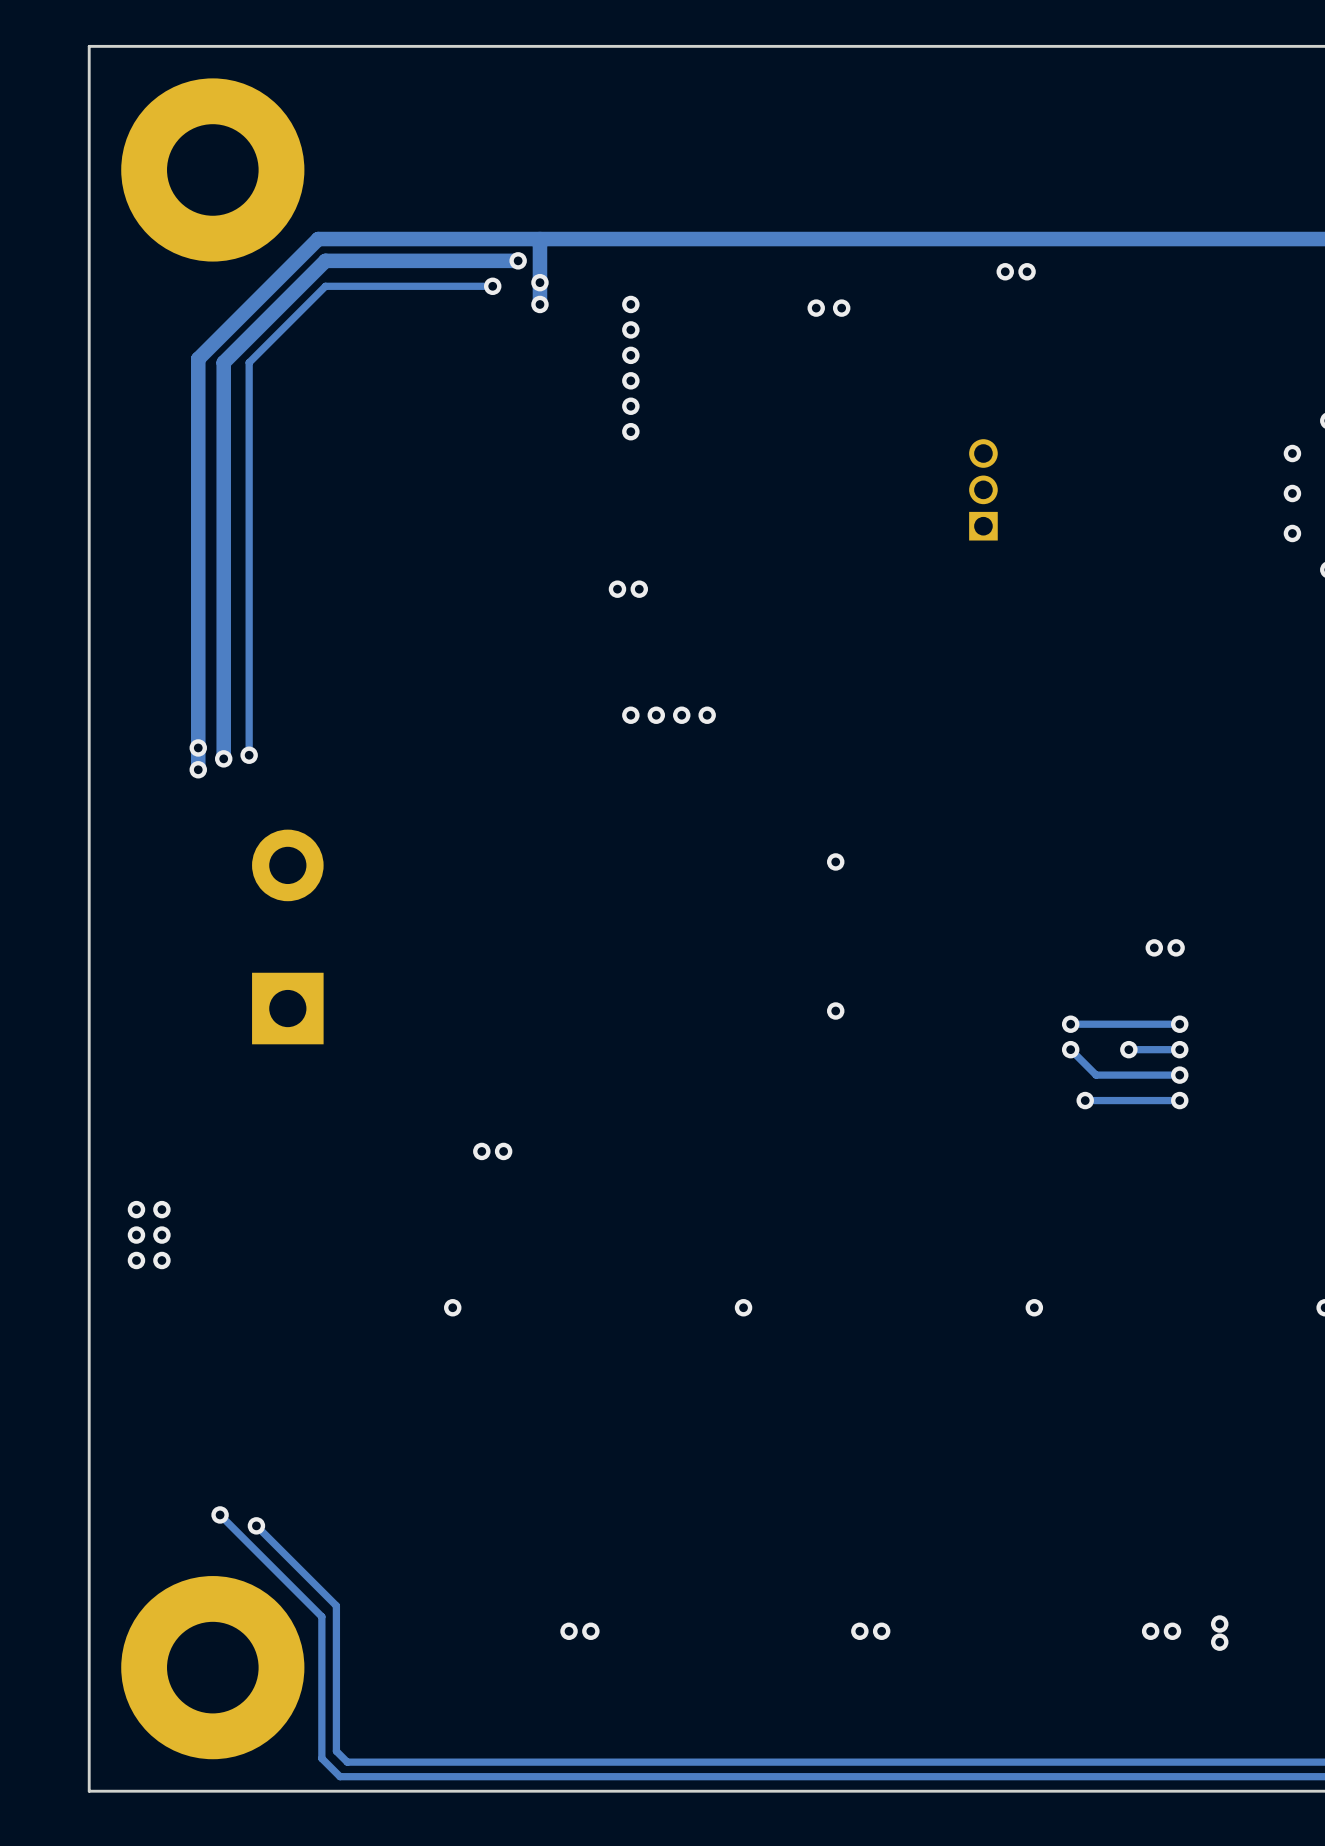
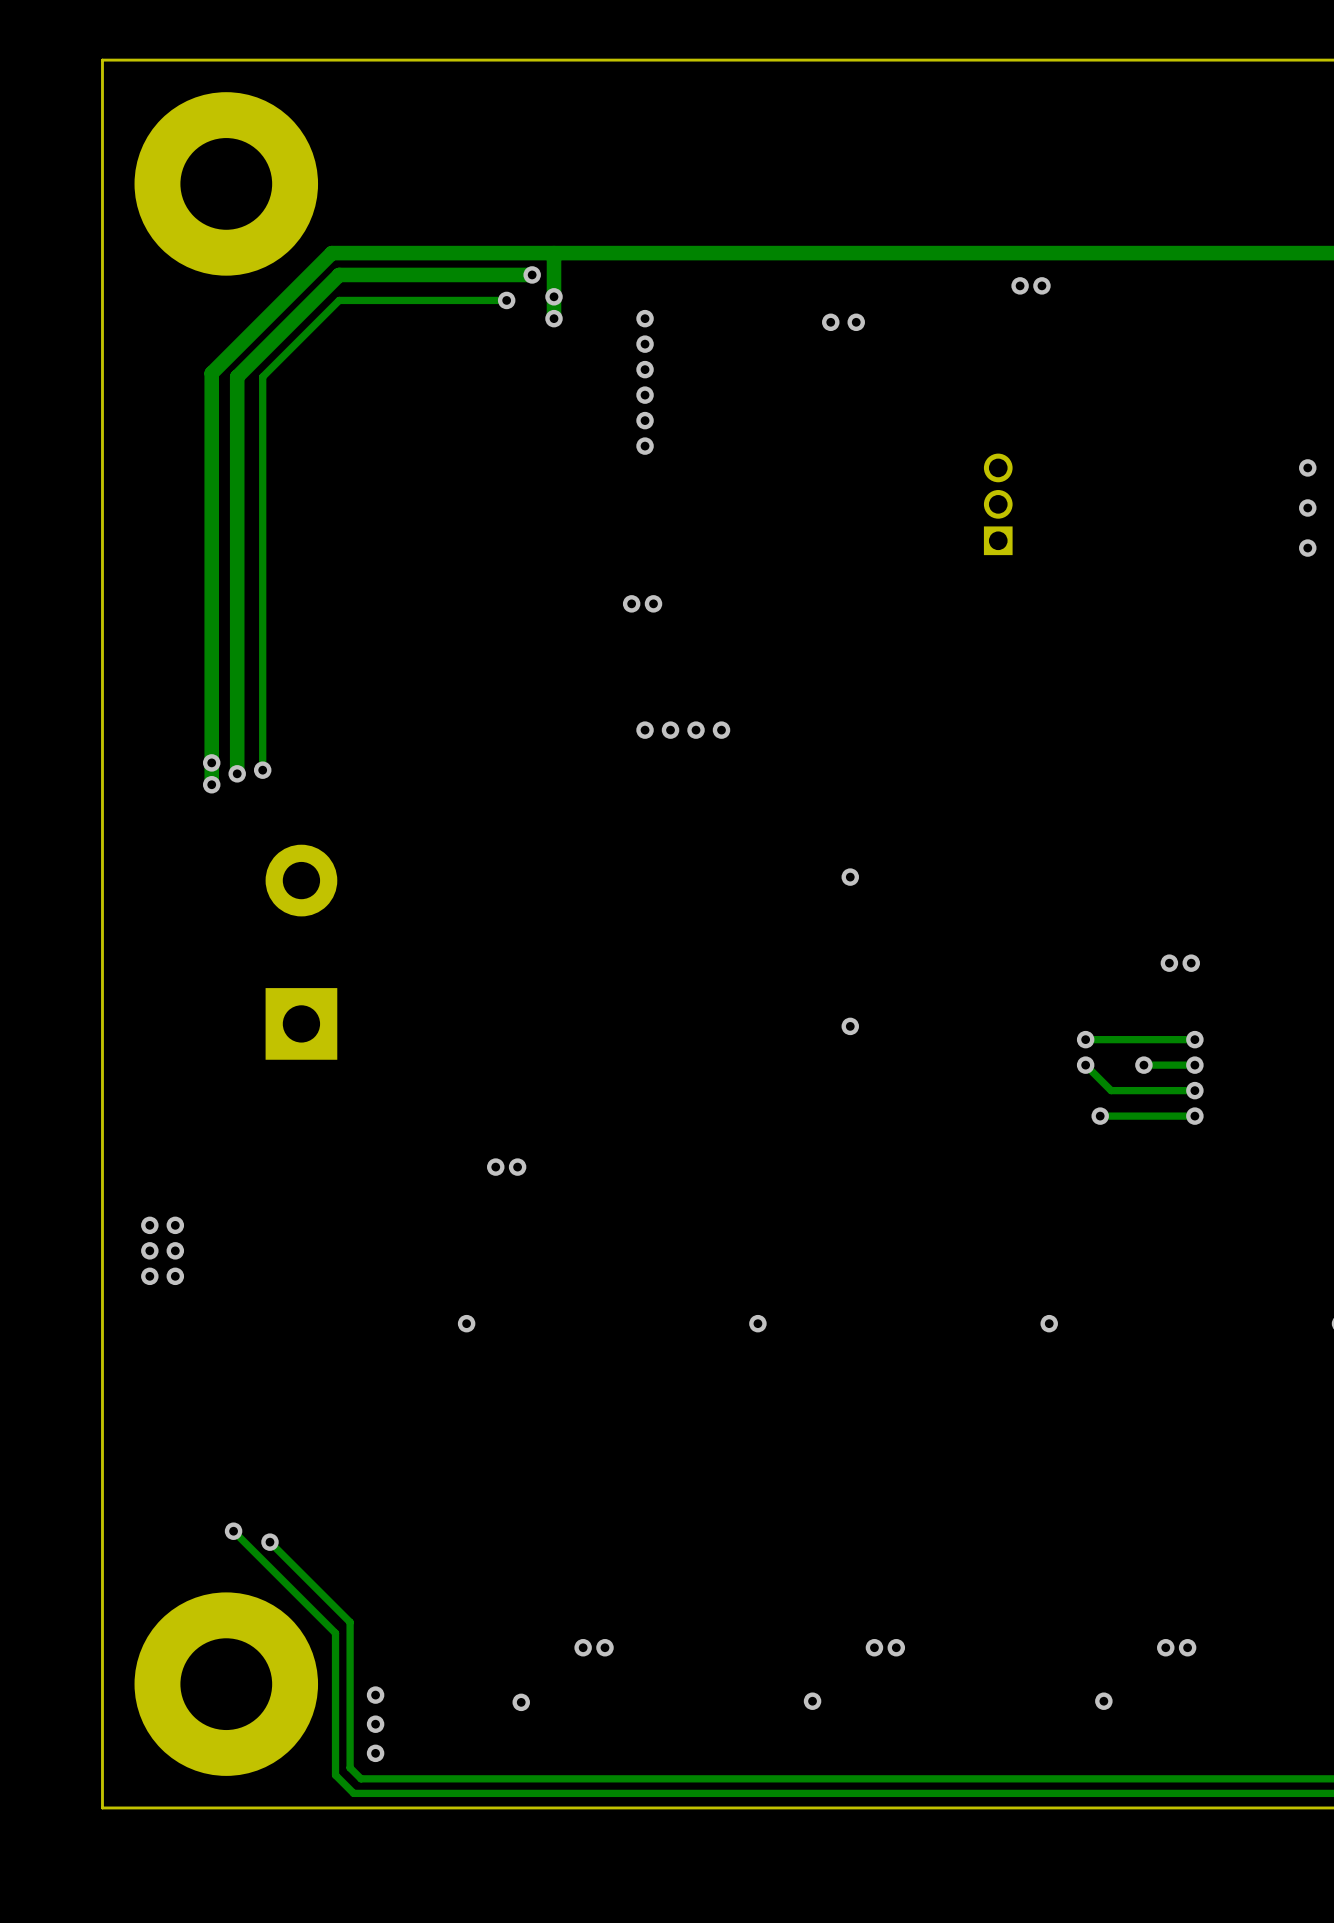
via: (1219, 1624) -> none
via: (1219, 1642) -> none
via: none -> (375, 1695)
via: none -> (812, 1701)
via: none -> (1103, 1701)
via: none -> (521, 1702)
via: none -> (375, 1724)
via: none -> (375, 1753)

